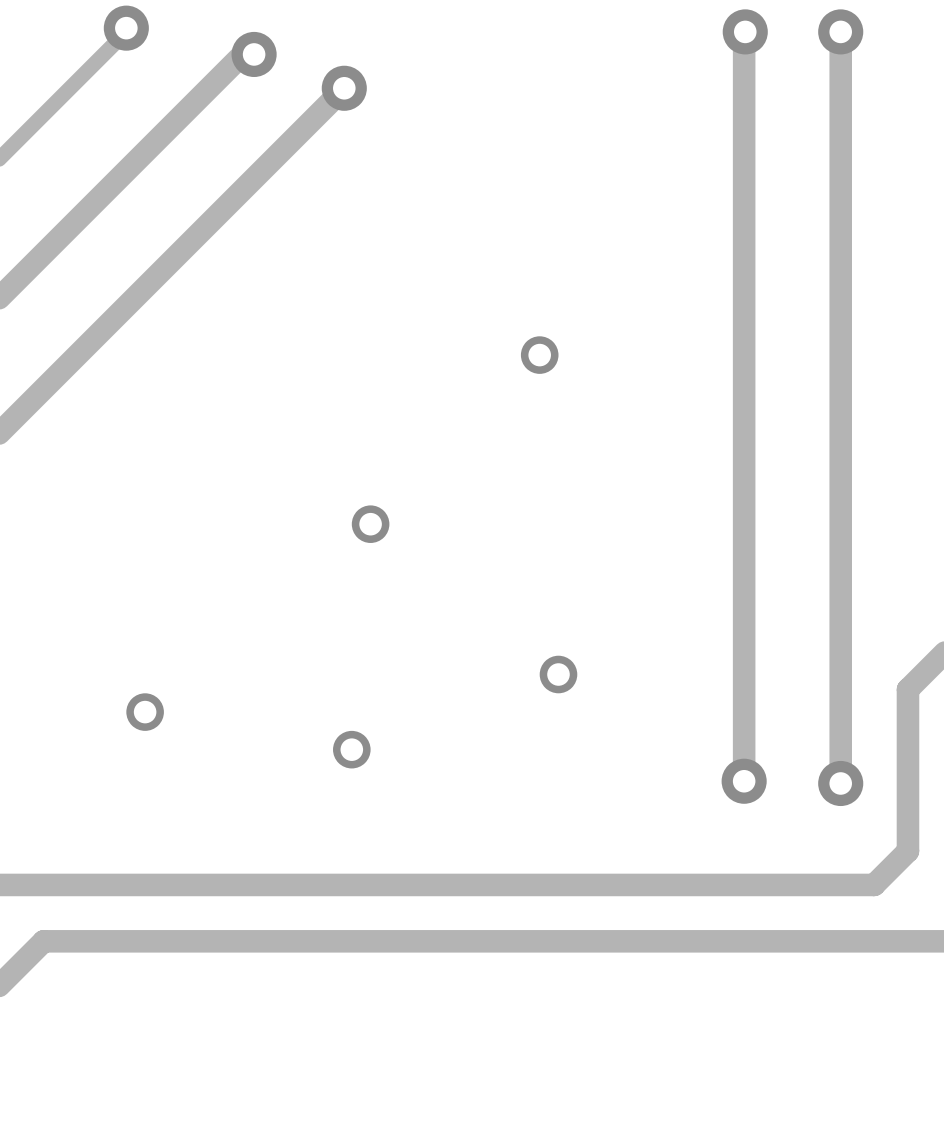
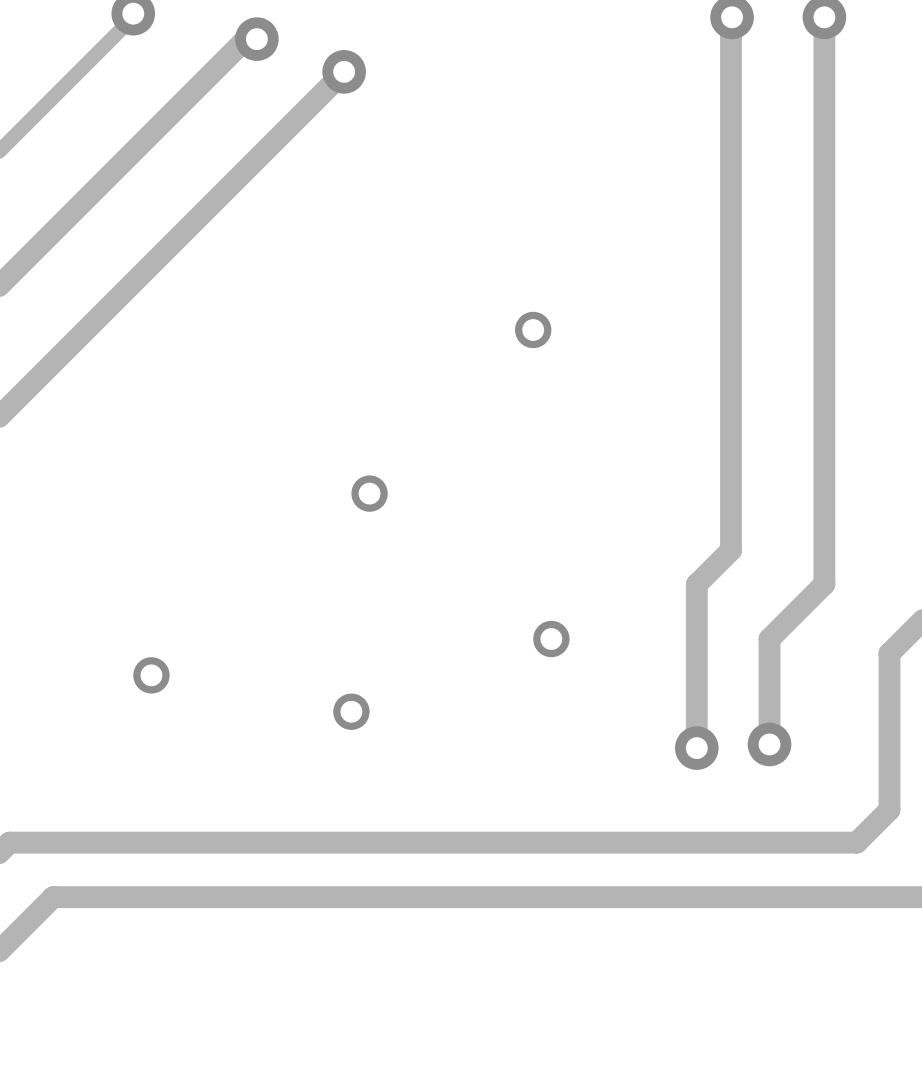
track: (744, 582) (744, 781) -> (730, 550) (696, 584) (696, 748)
track: (840, 617) (840, 783) -> (824, 584) (769, 639) (769, 744)
via: (744, 781) -> none
via: none -> (769, 744)
via: (840, 783) -> none
via: none -> (696, 748)

